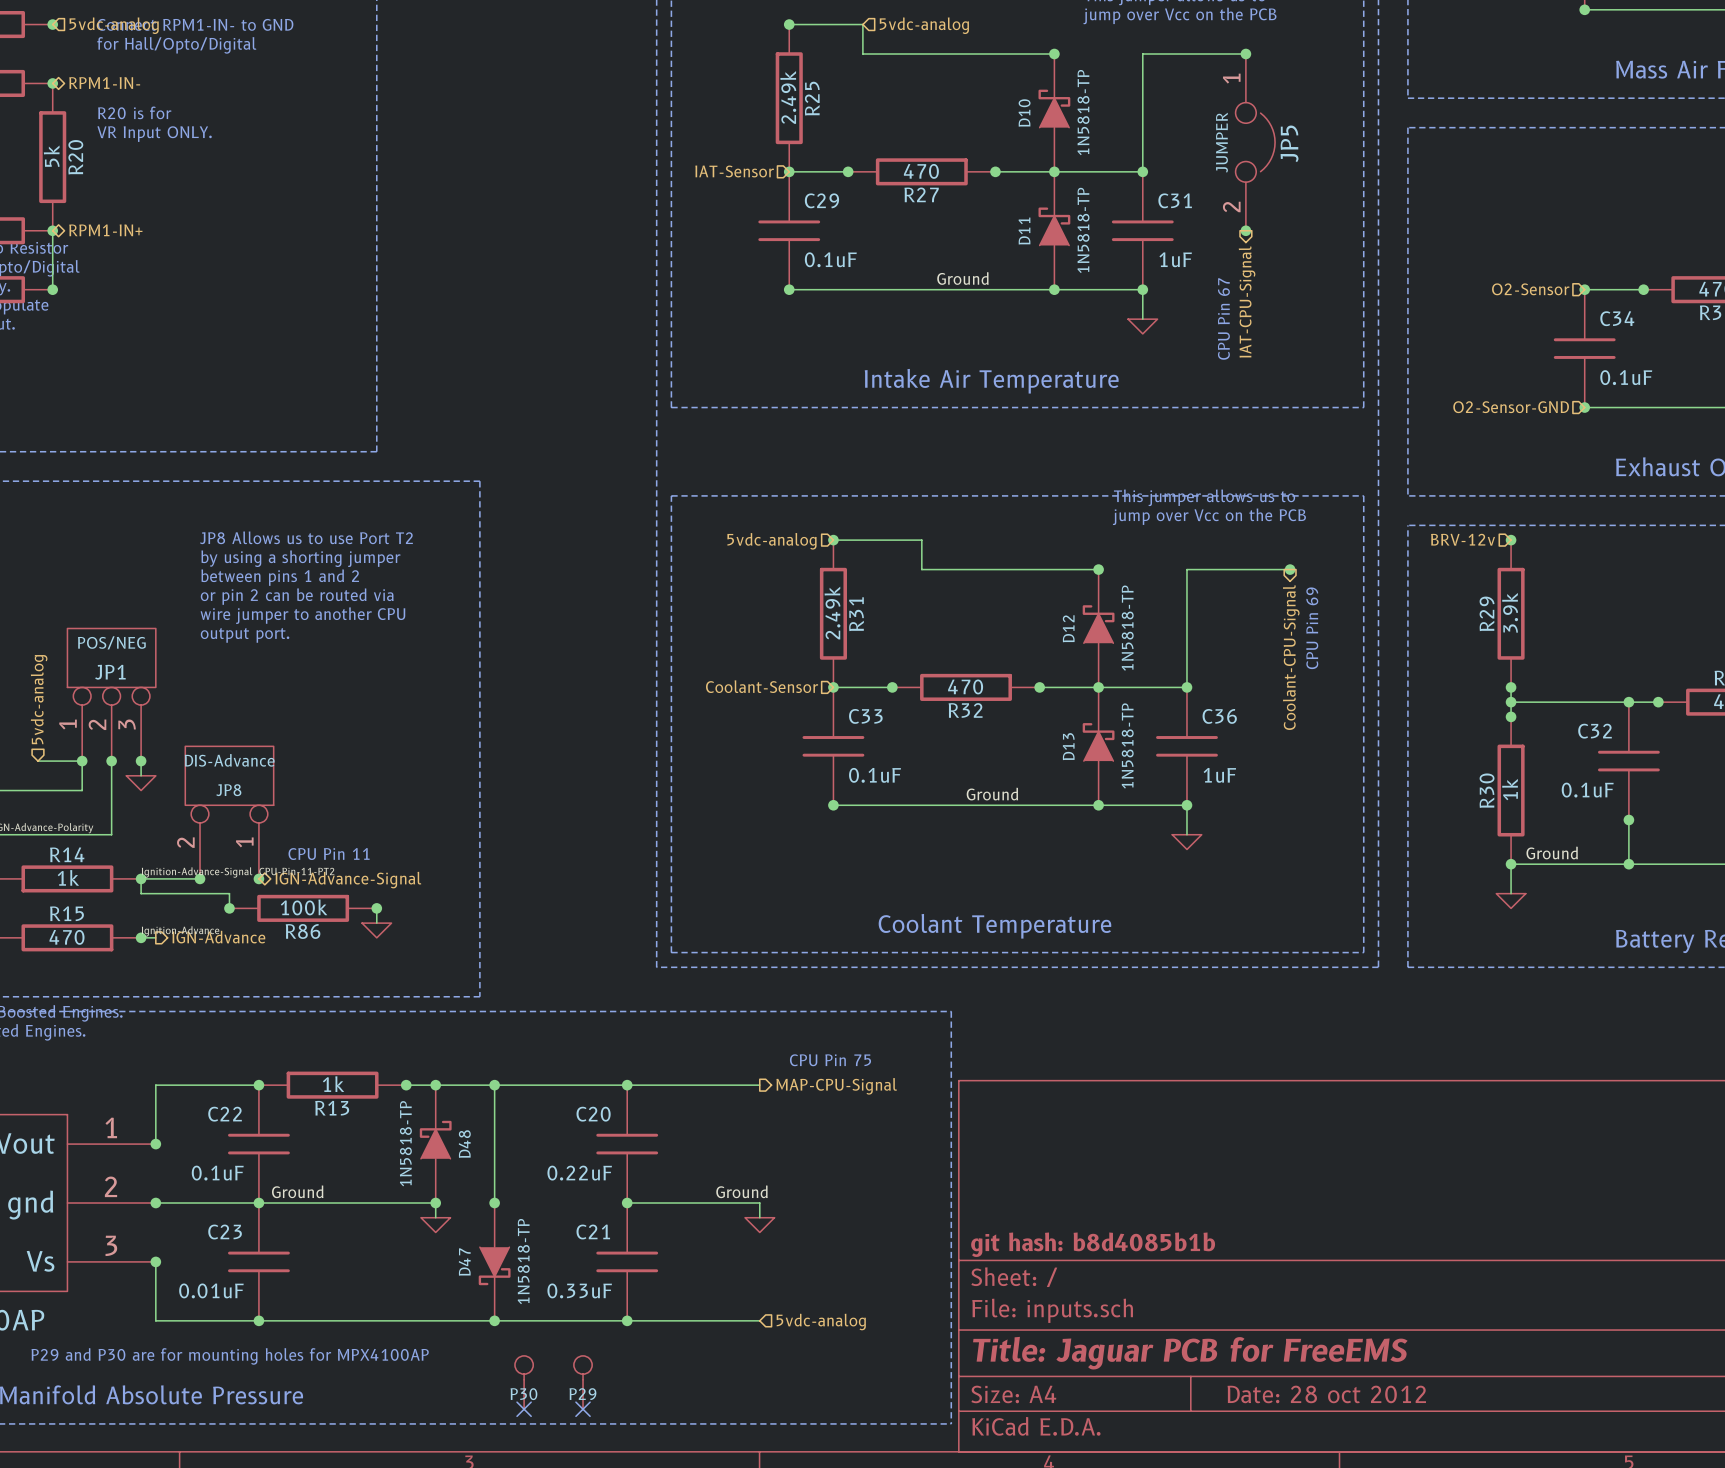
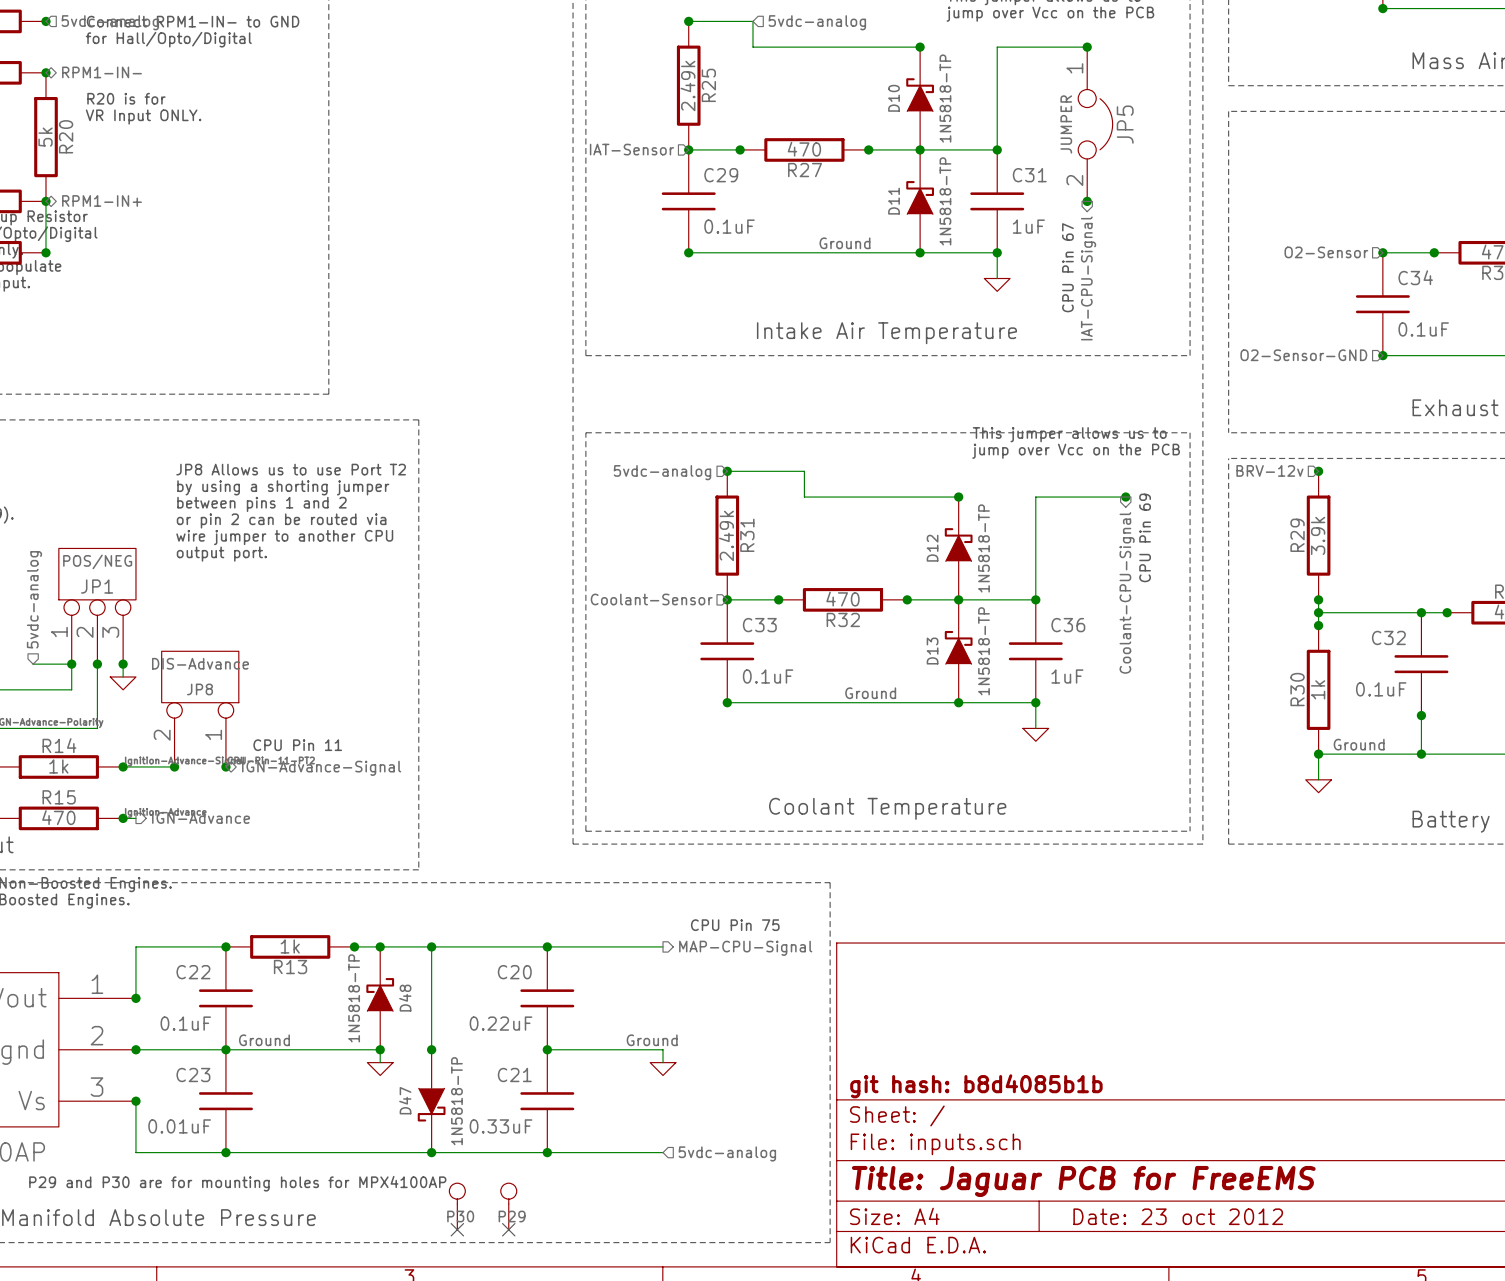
wire: (141, 878) (141, 893) (229, 893) (229, 908) -> none
junction: (229, 908) -> none
R86: 100k (303, 908) -> none
wire: (376, 908) (376, 923) -> none
junction: (376, 908) -> none
power symbol: (376, 930) -> none
title block: Date: 28 oct 2012 (1326, 1394) -> Date: 23 oct 2012 (1178, 1216)

